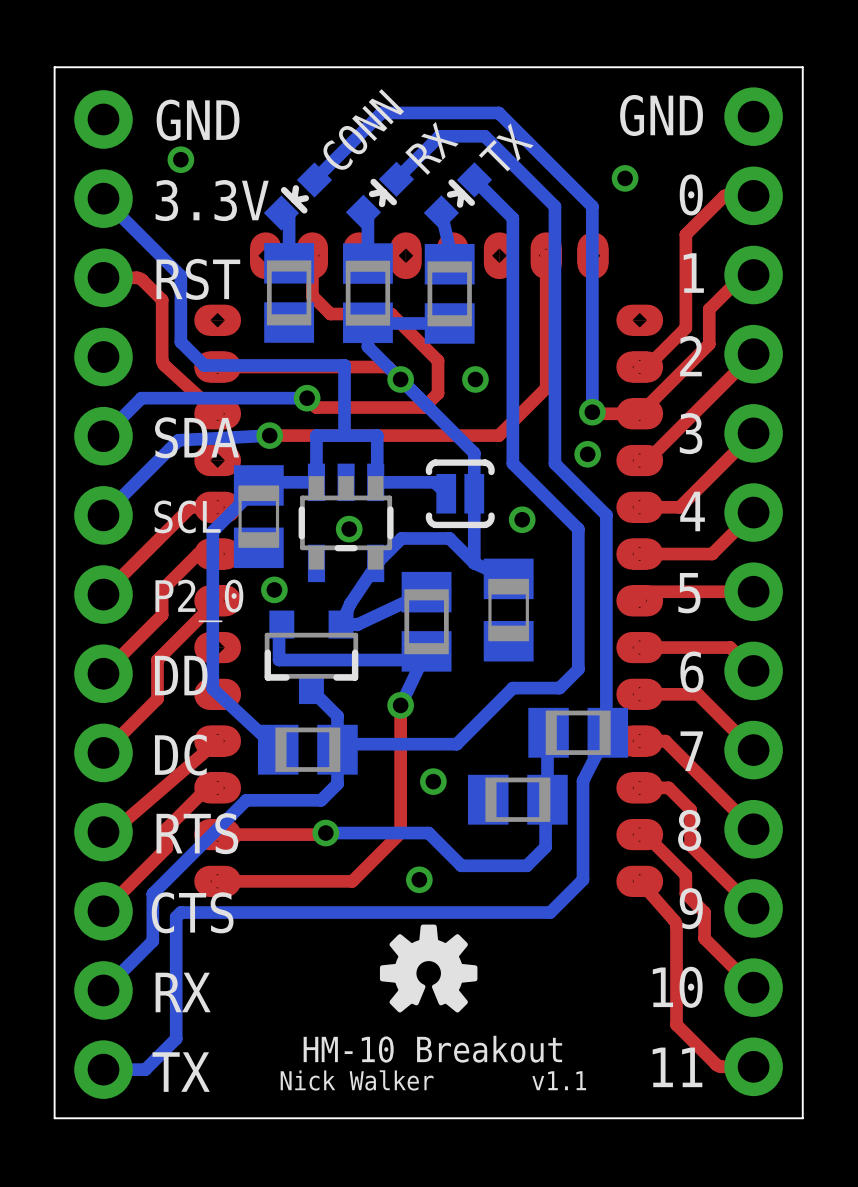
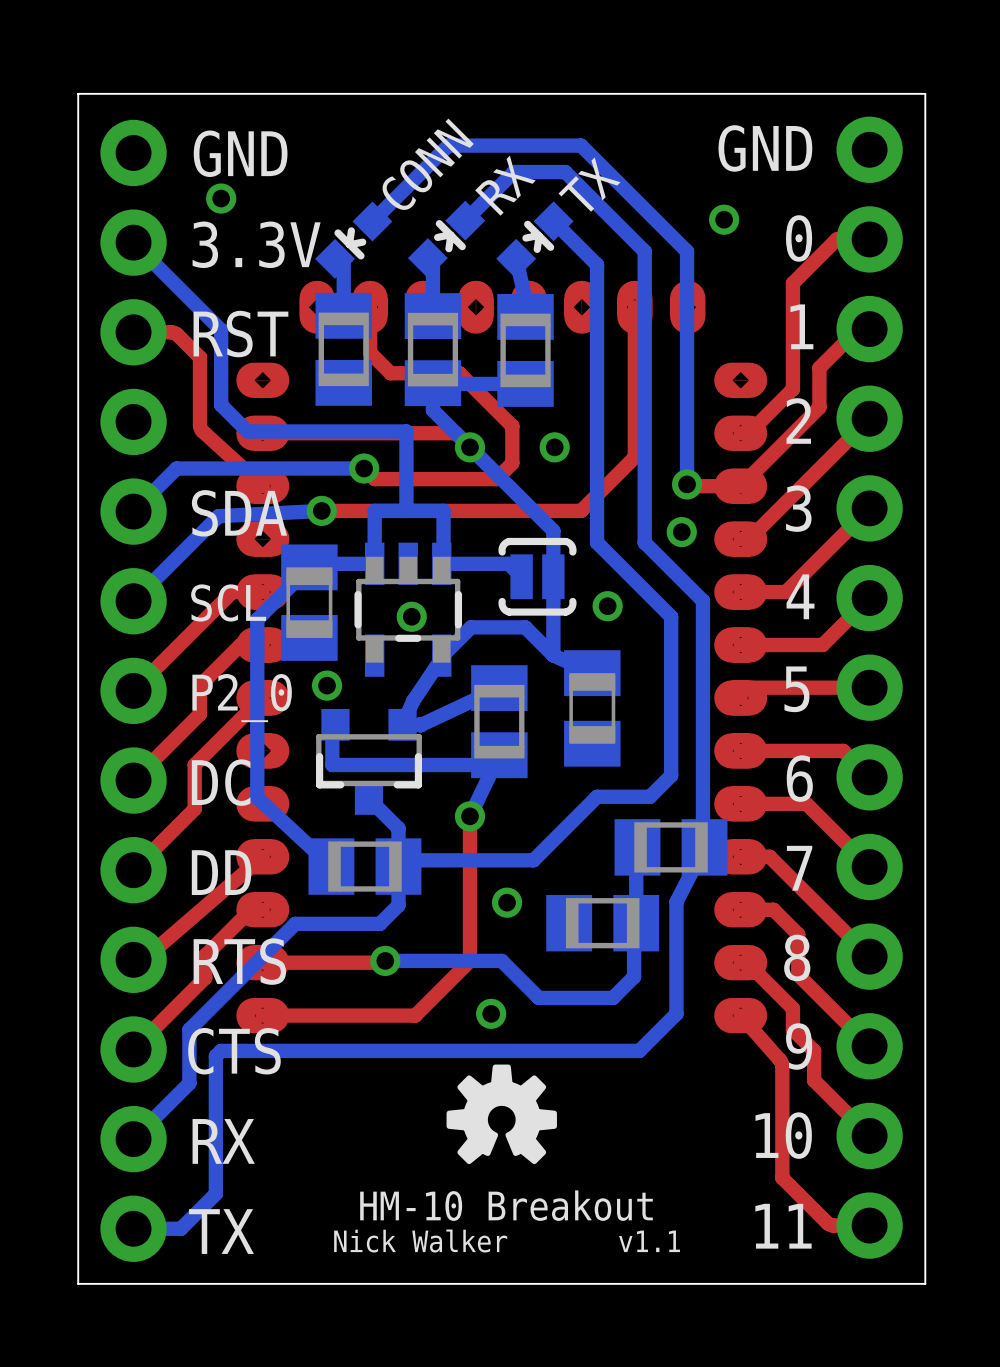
text: DD (181, 675) -> DC (221, 782)
text: DC (180, 755) -> DD (221, 872)

